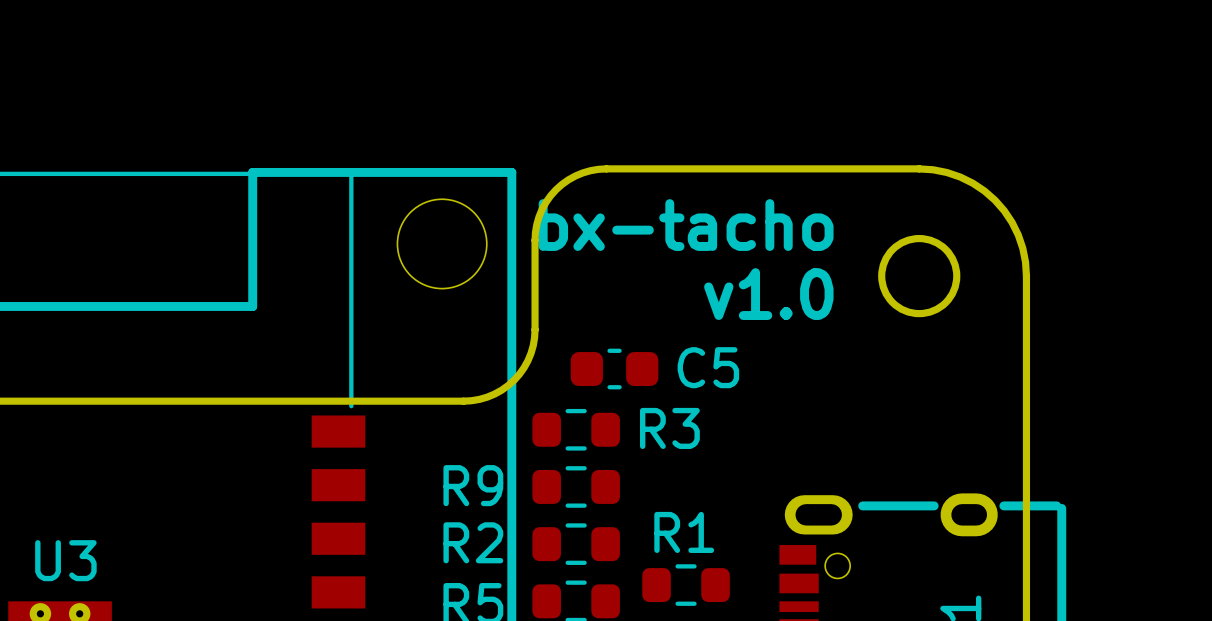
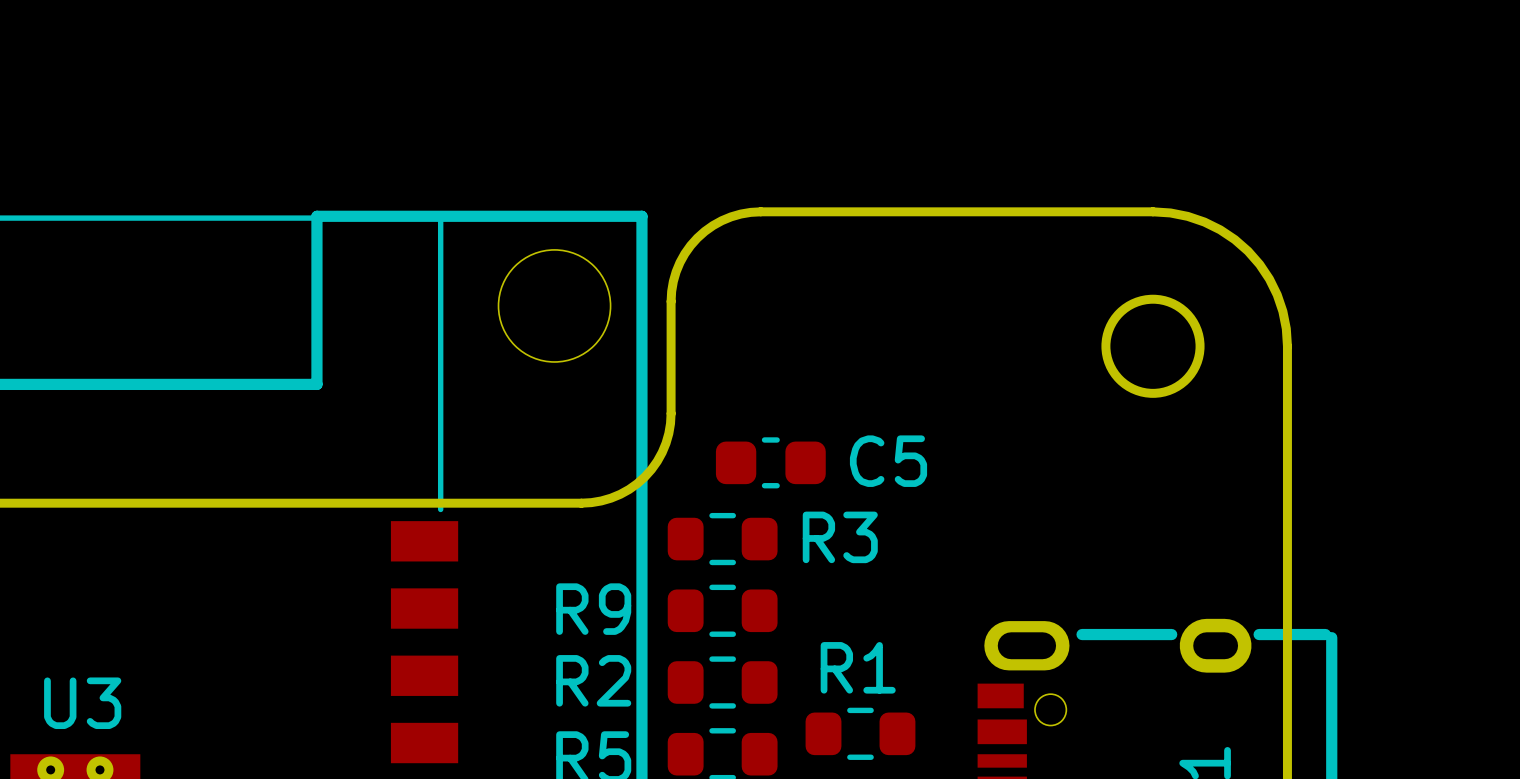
text: bx-tacho (686, 225) -> none
text: v1.0 (768, 294) -> none

